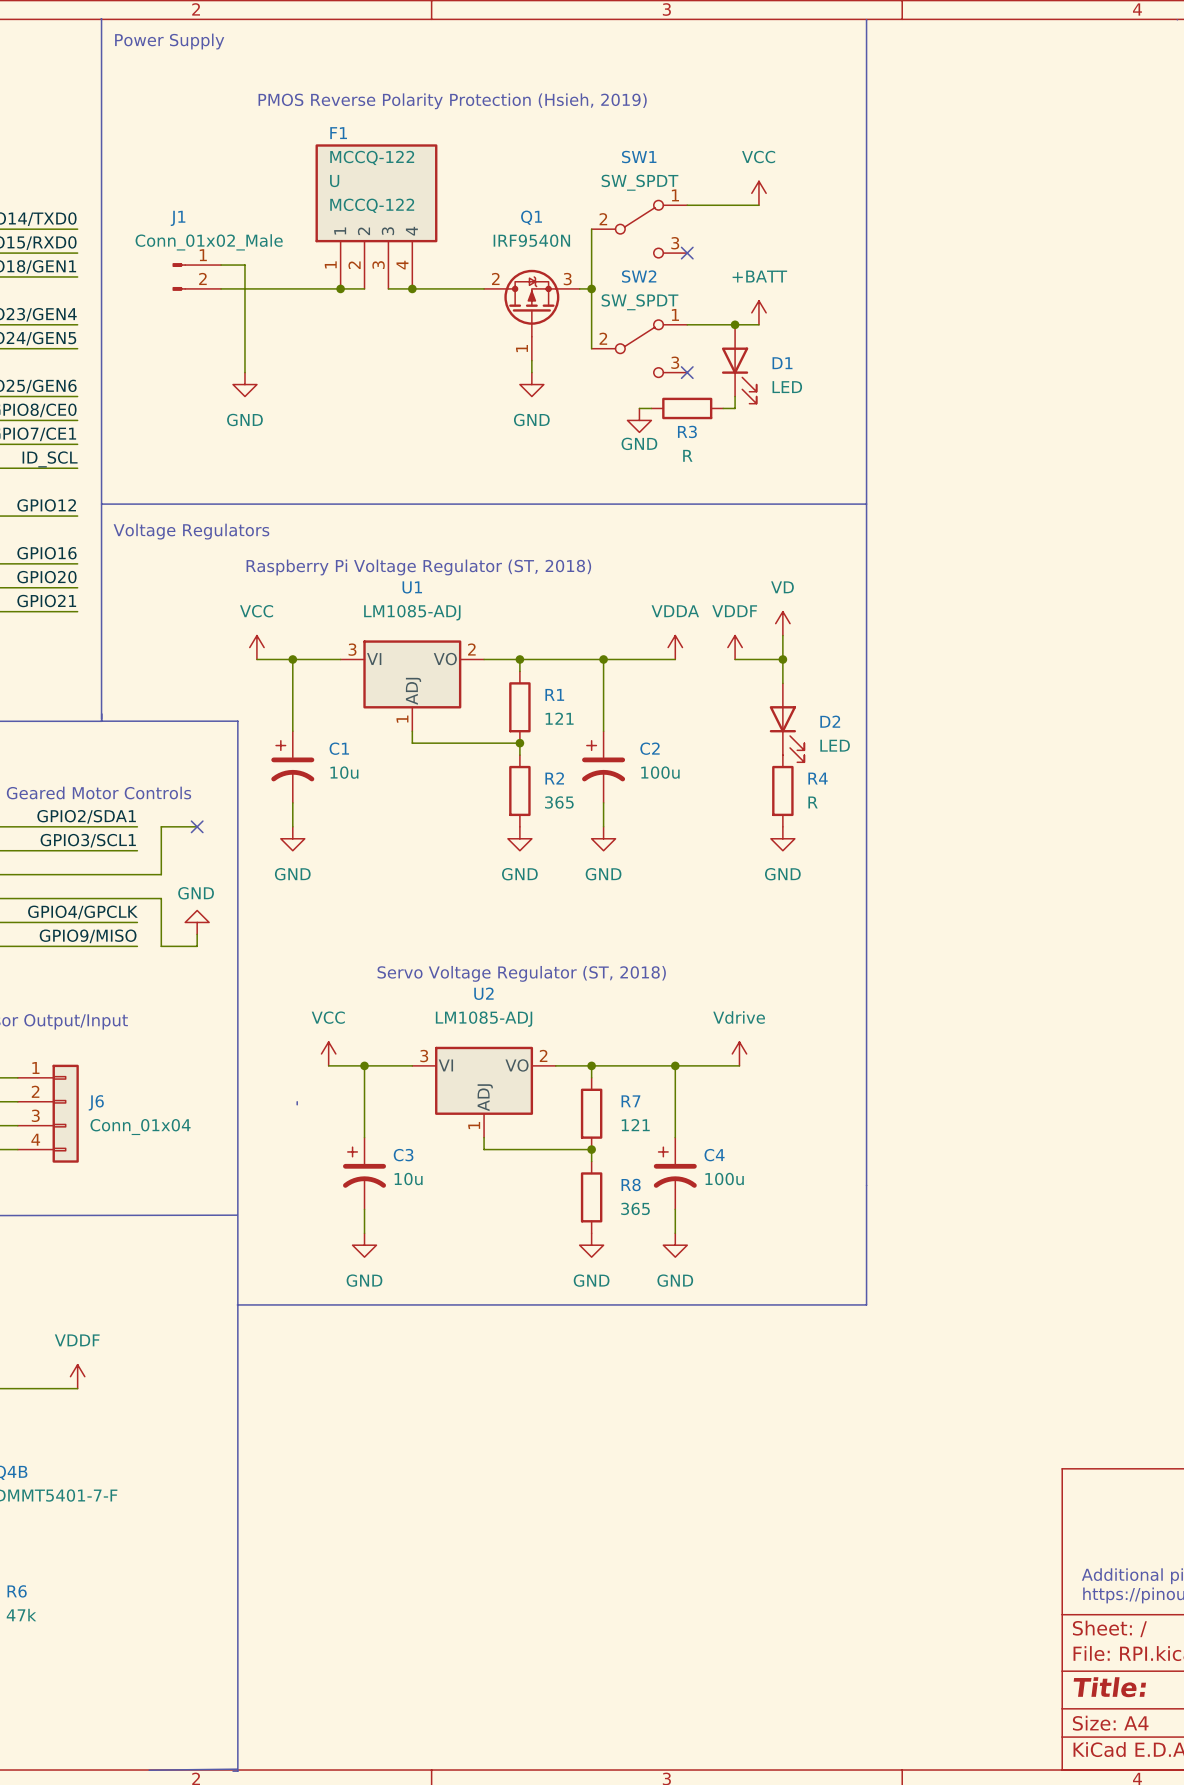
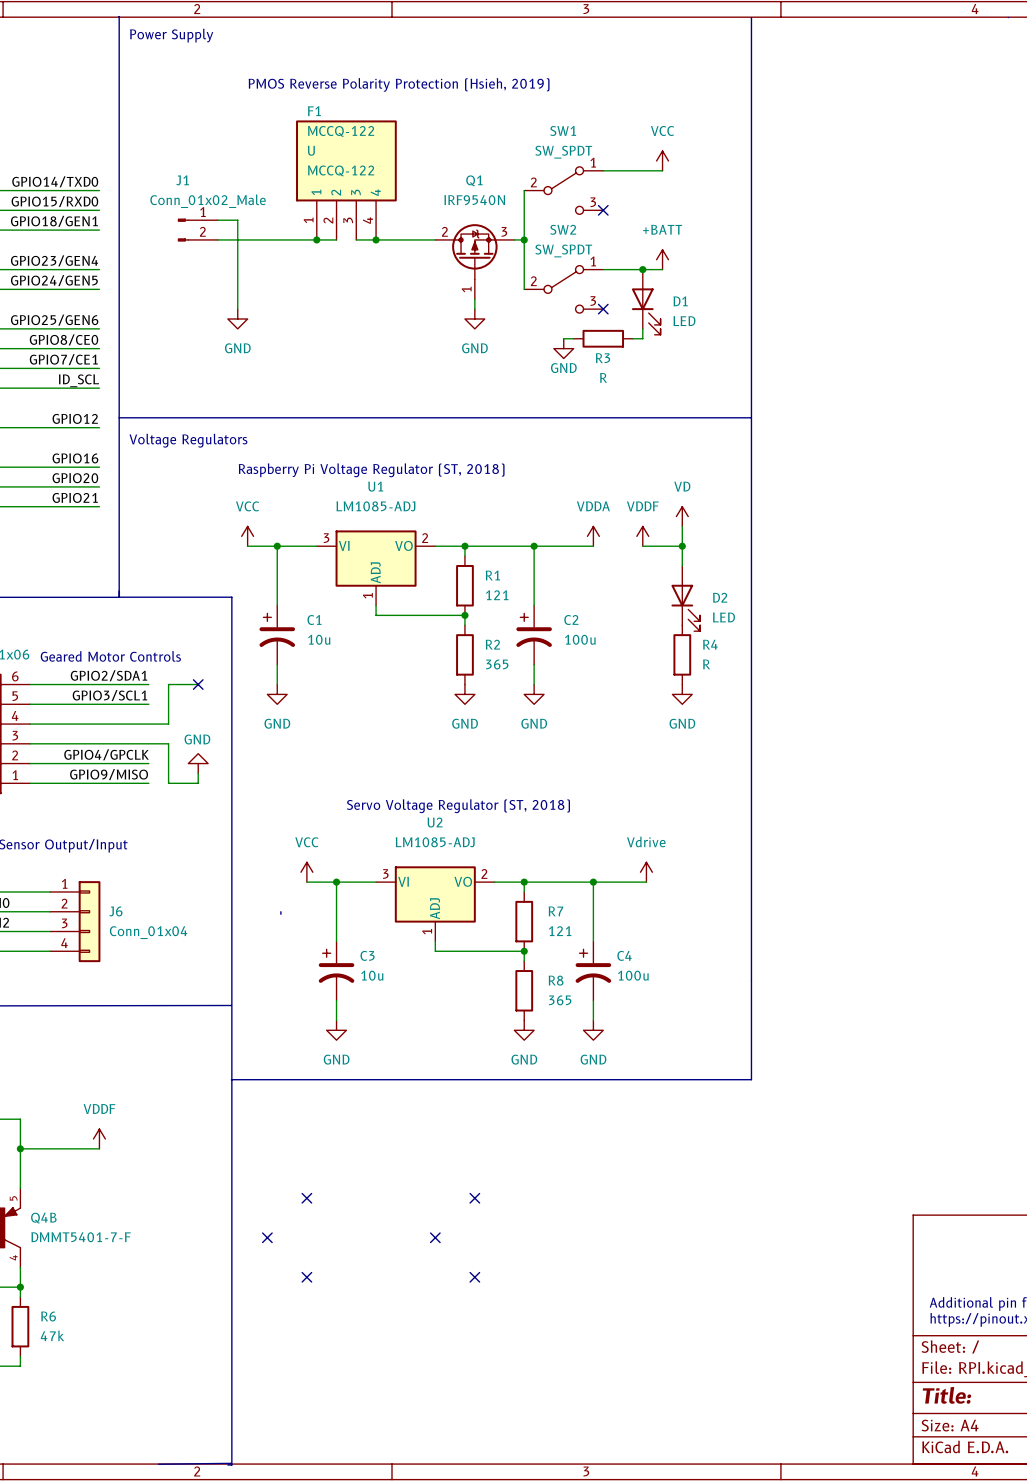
no-connect mark: none -> (306, 1198)
no-connect mark: none -> (474, 1198)
no-connect mark: none -> (267, 1237)
no-connect mark: none -> (435, 1237)
no-connect mark: none -> (306, 1277)
no-connect mark: none -> (474, 1277)

